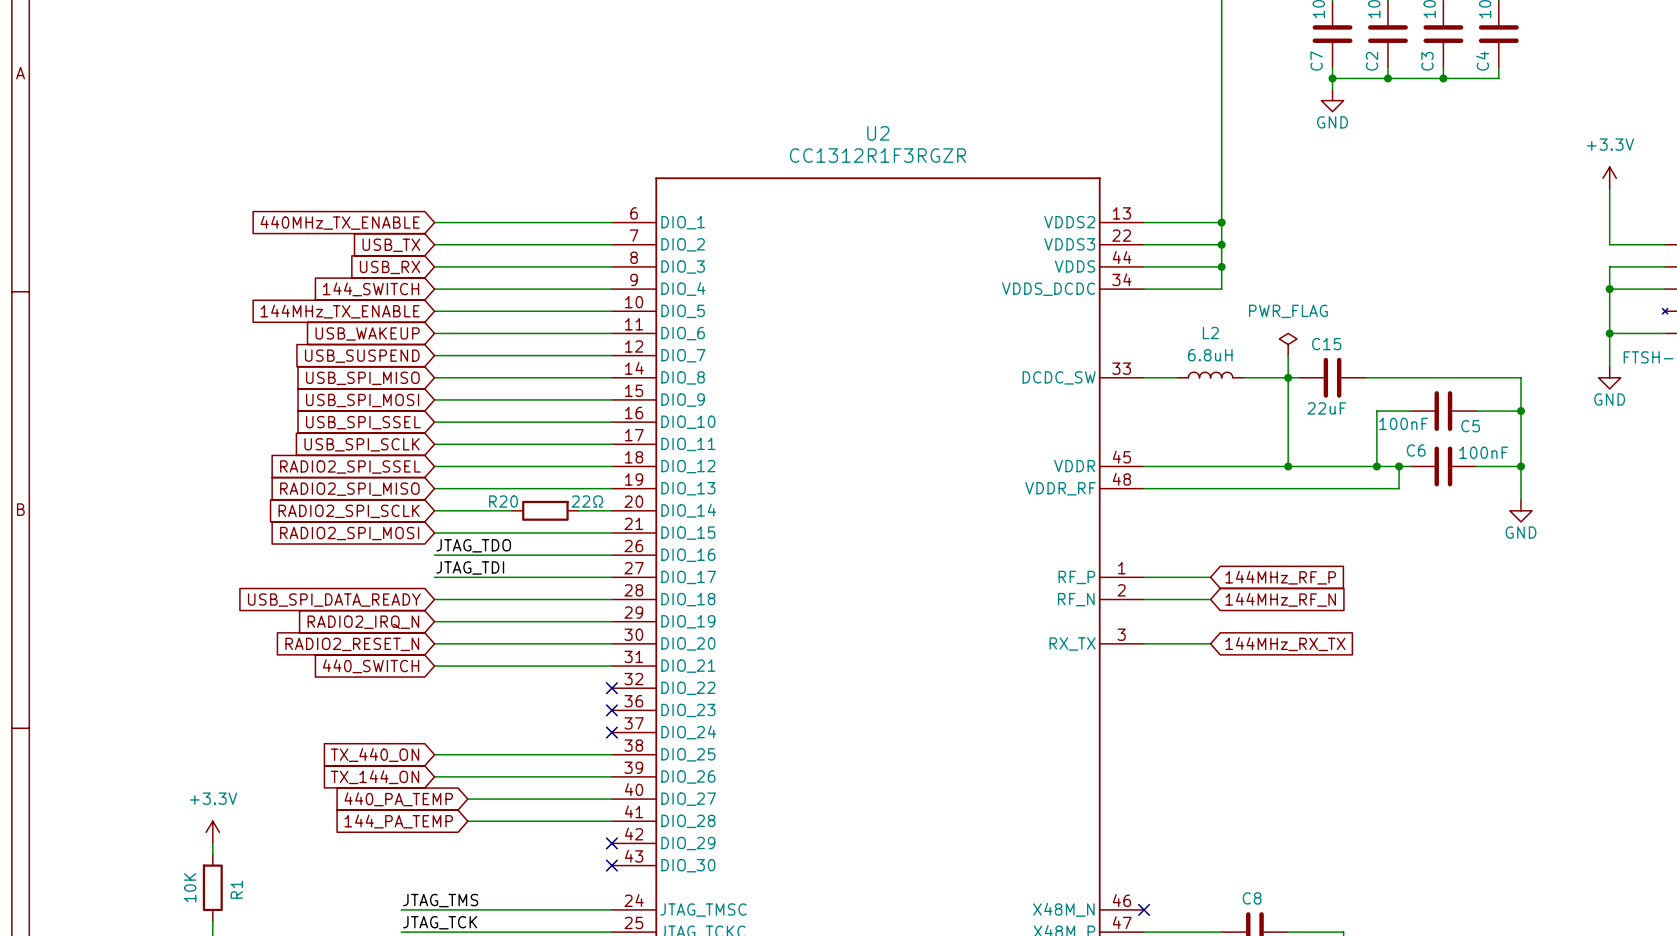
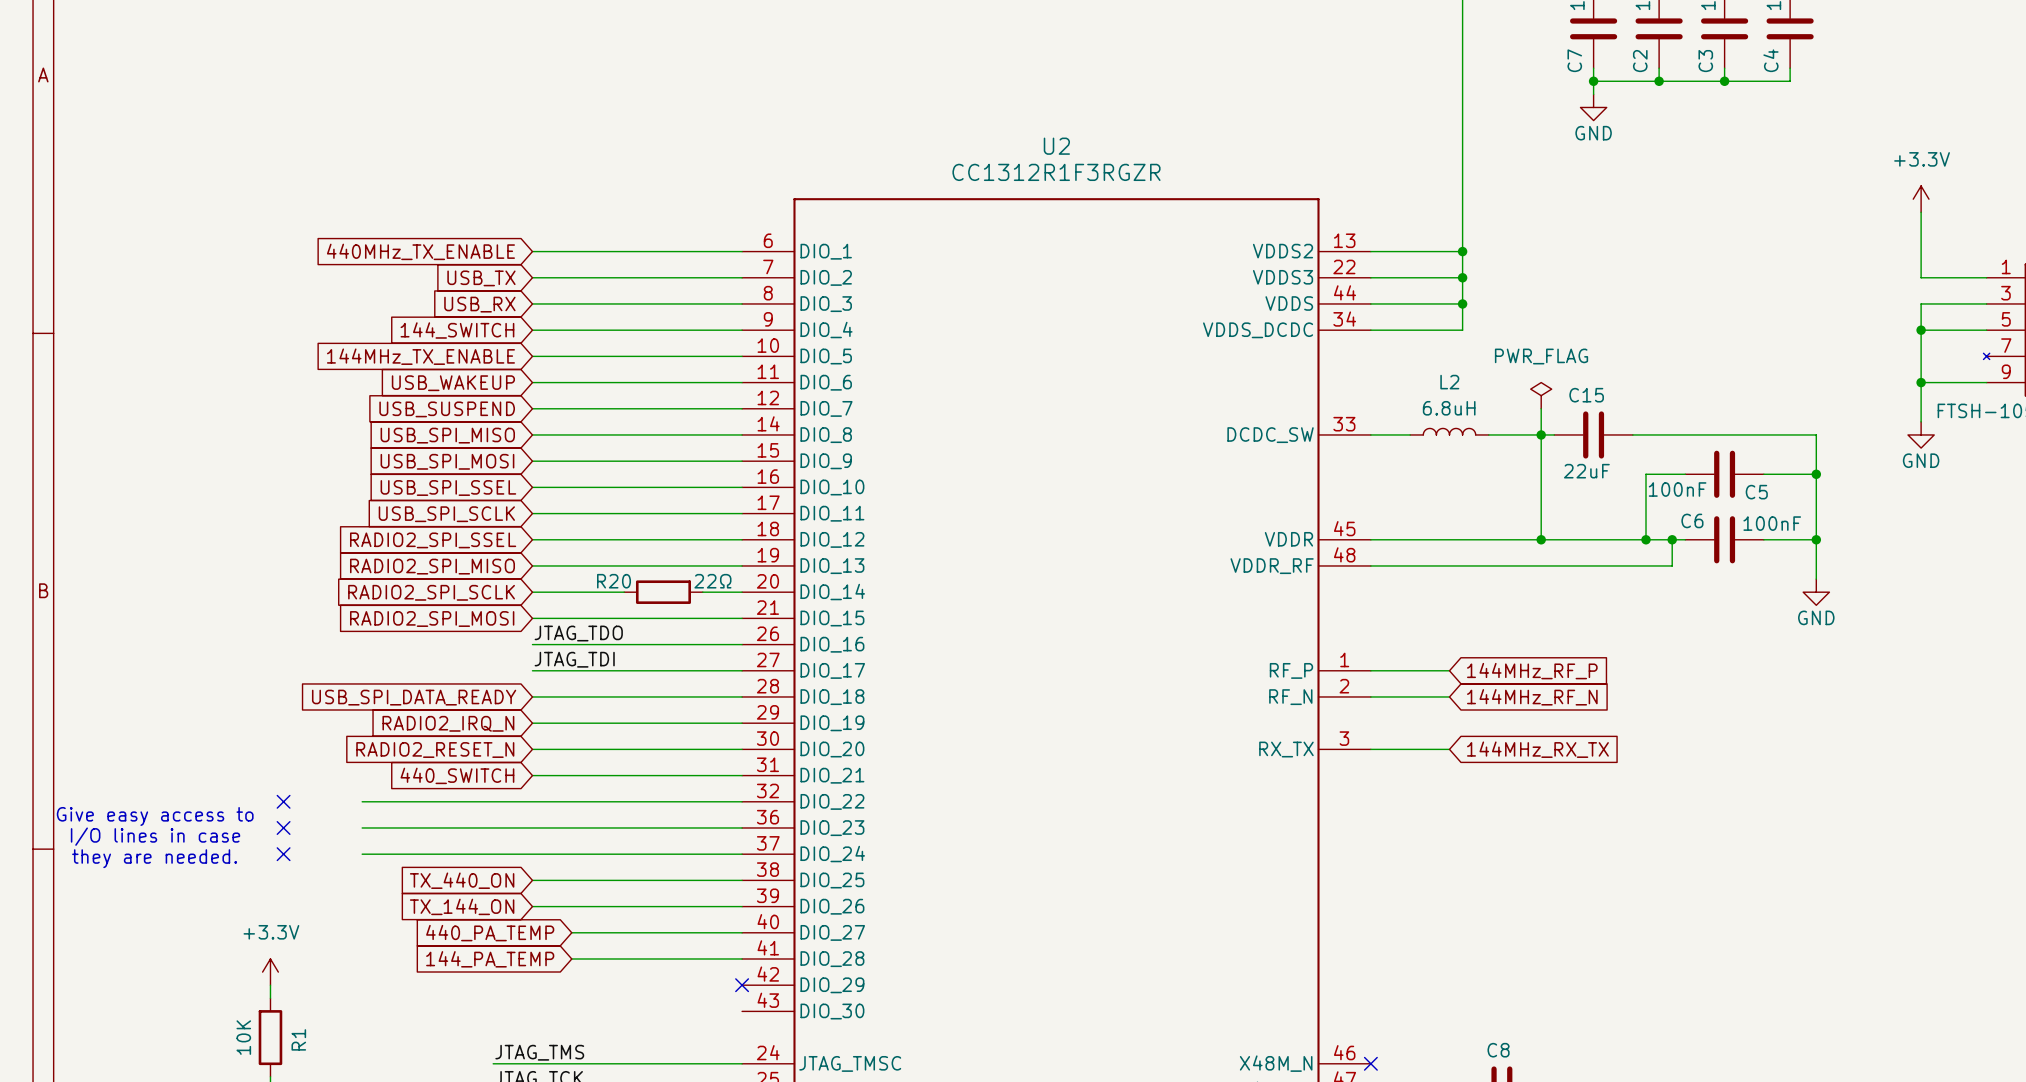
no-connect mark: none -> (283, 801)
wire: none -> (362, 801) (742, 801)
no-connect mark: (611, 688) -> none
text: none -> Give easy access to (155, 816)
no-connect mark: none -> (283, 827)
wire: none -> (362, 827) (742, 827)
no-connect mark: (611, 710) -> none
text: none -> I/O lines in case (155, 836)
no-connect mark: none -> (283, 854)
wire: none -> (362, 854) (742, 854)
no-connect mark: (611, 732) -> none
text: none -> they are needed. (154, 858)
no-connect mark: (611, 865) -> none

